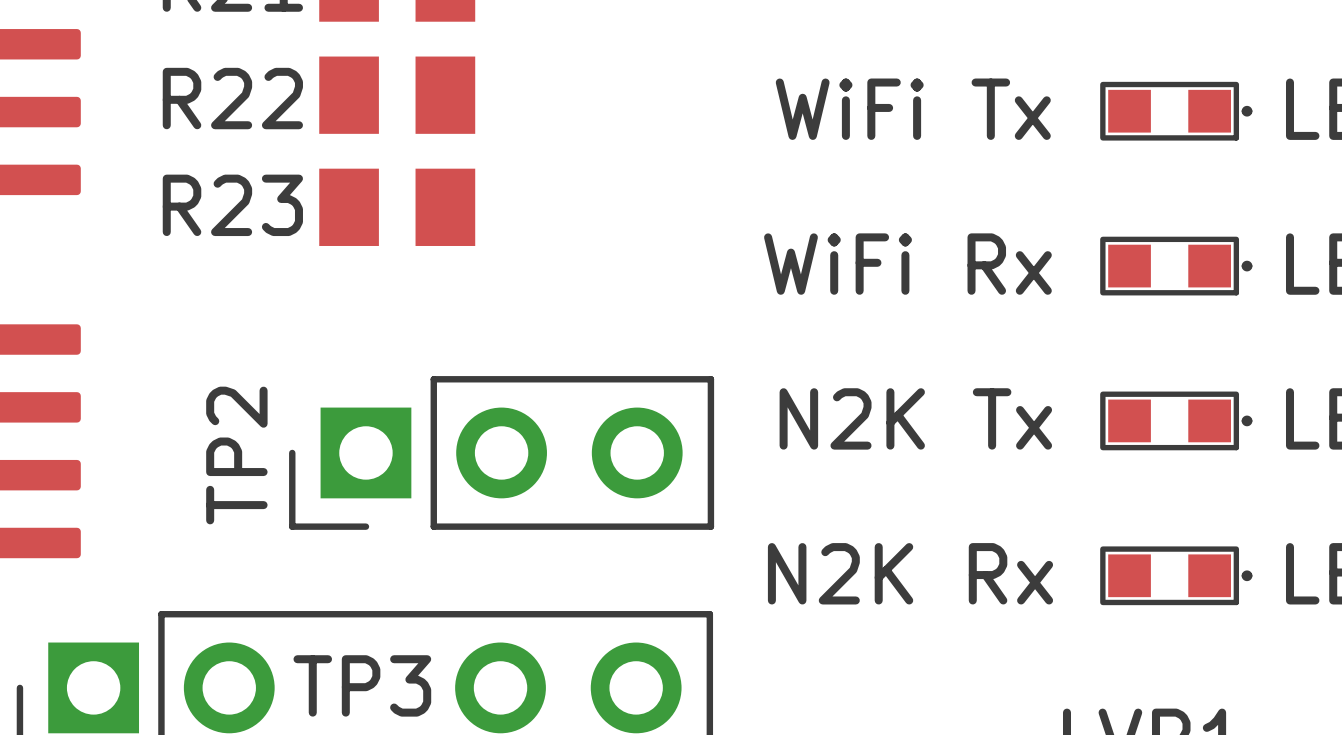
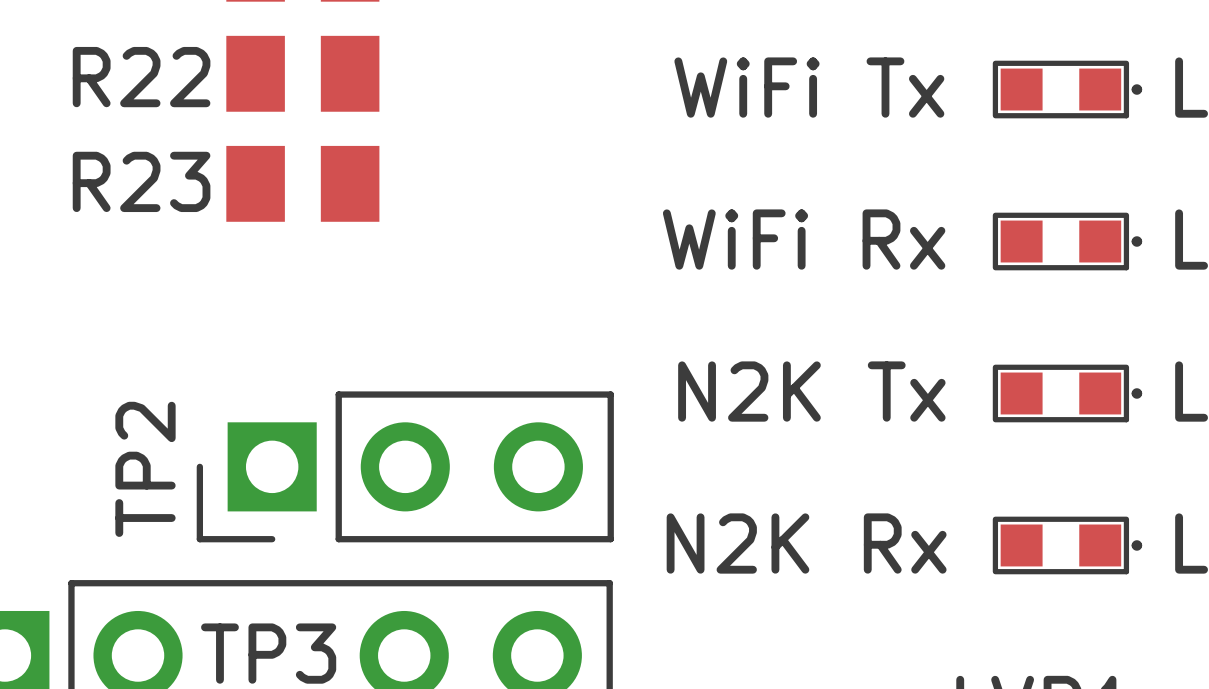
TP2 position: (501, 452) -> (405, 466)

